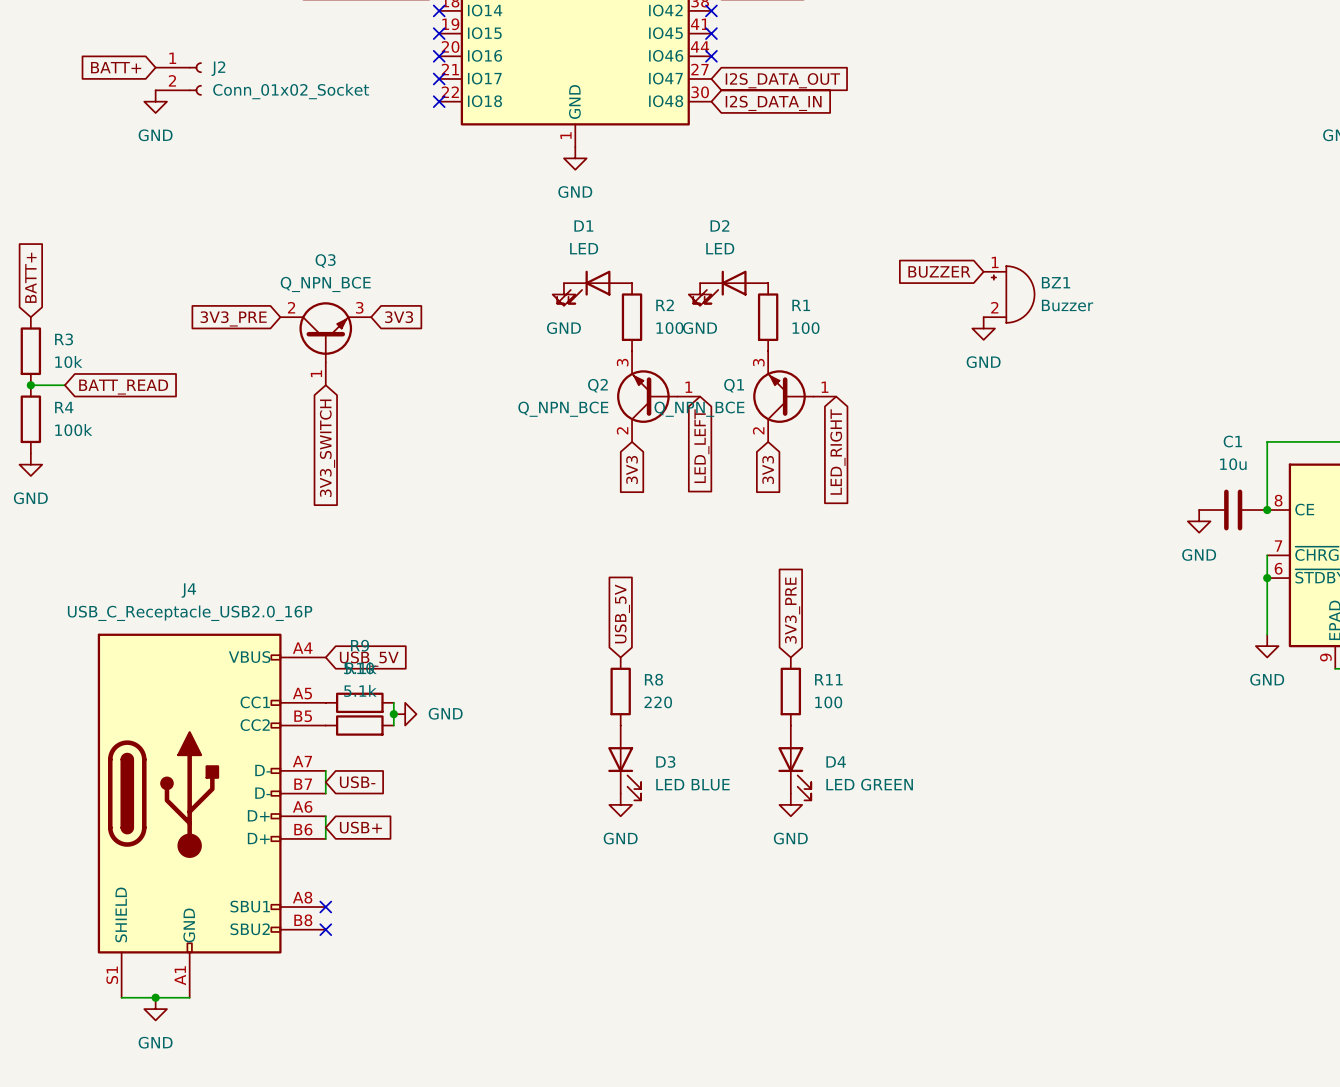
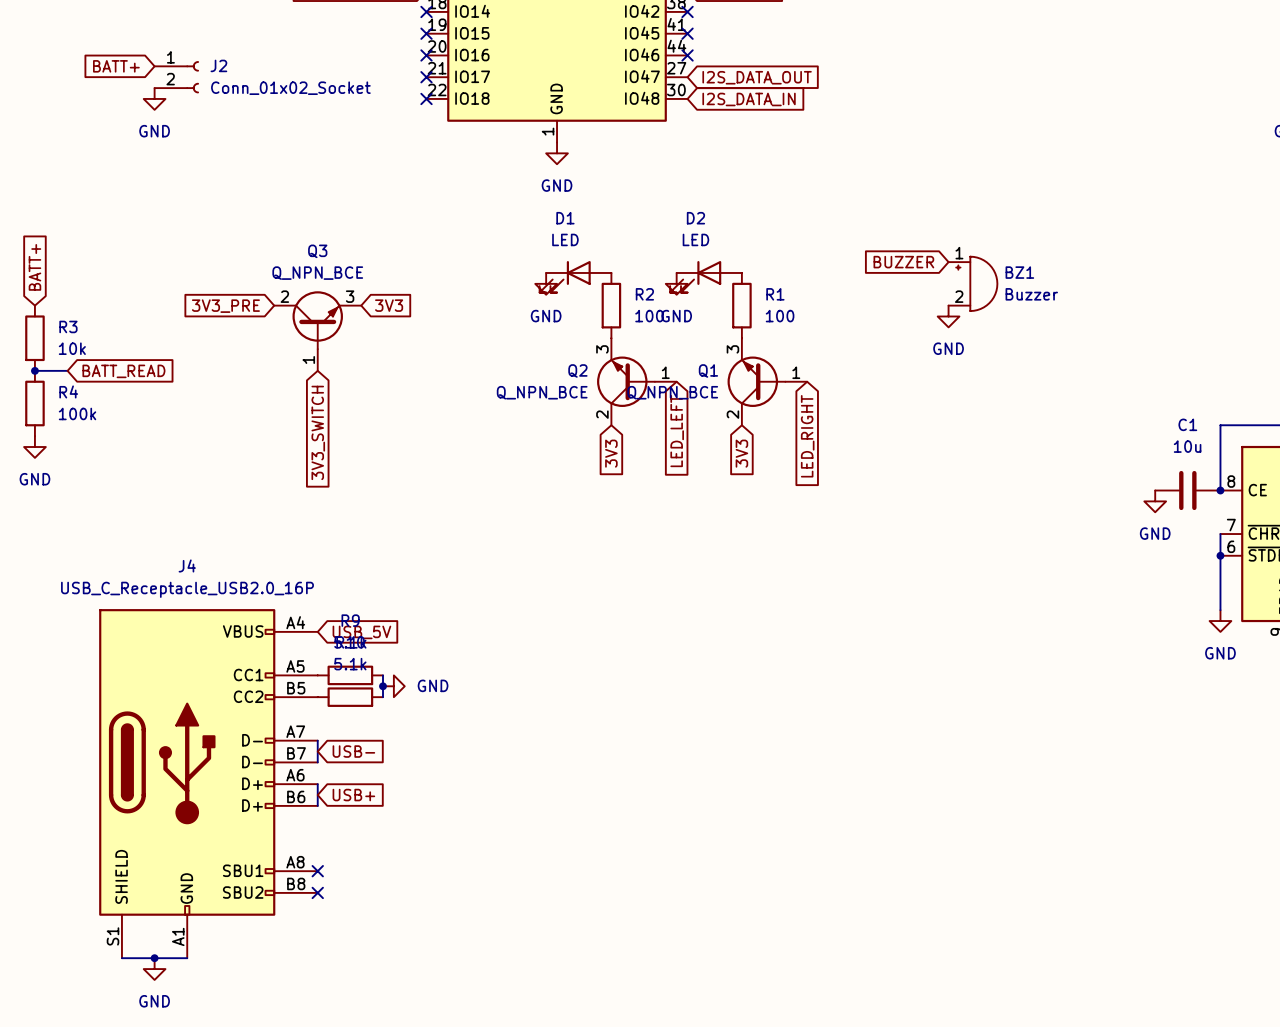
global label: 3V3_PRE (792, 610) -> none
global label: USB_5V (622, 613) -> none
R8: 220 (620, 691) -> none
R11: 100 (790, 691) -> none
D3: LED BLUE (624, 762) -> none
D4: LED GREEN (794, 762) -> none
power symbol: GND (620, 804) -> none
power symbol: GND (790, 804) -> none

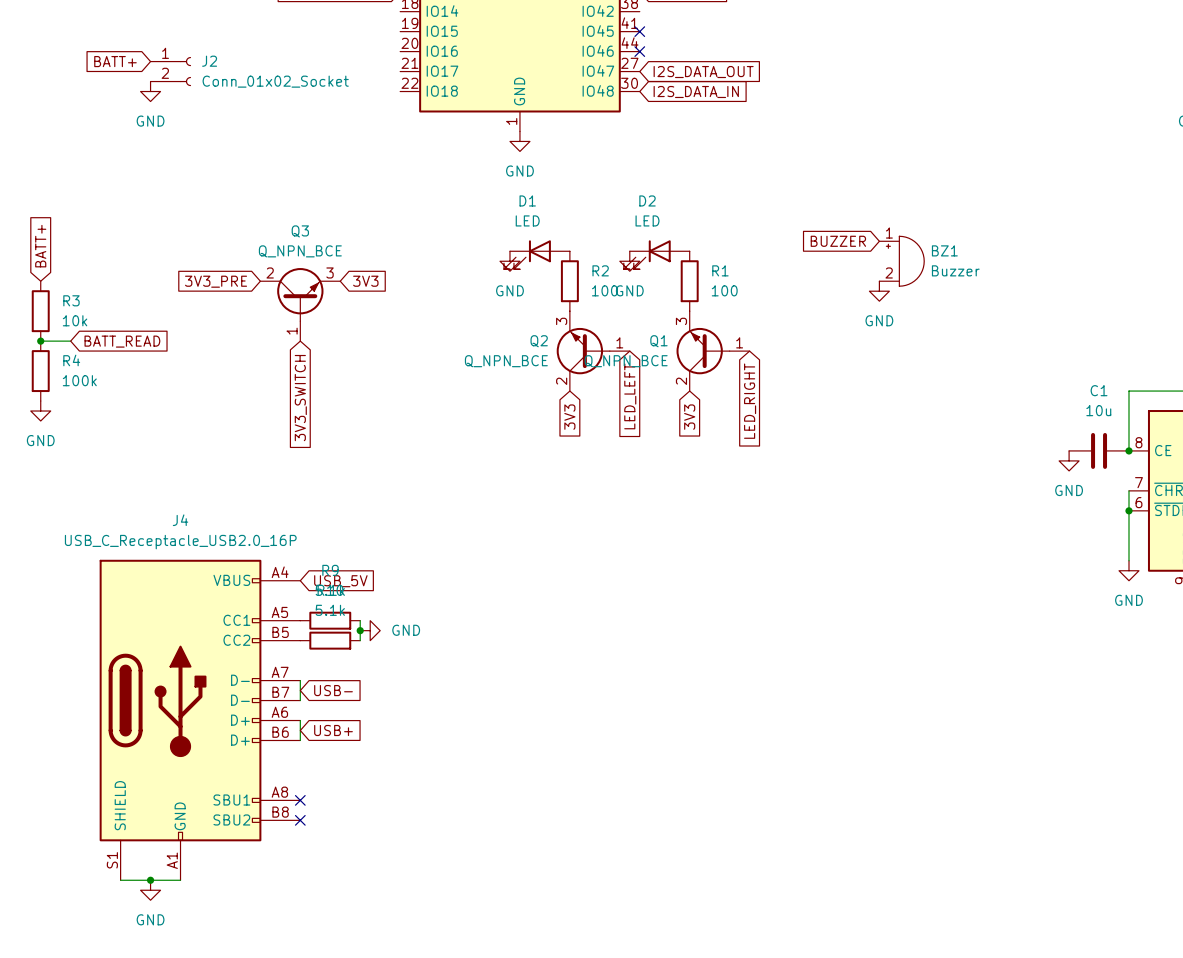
no-connect mark: (426, 11) -> none
no-connect mark: (687, 11) -> none
no-connect mark: (426, 33) -> none
no-connect mark: (426, 55) -> none
no-connect mark: (426, 77) -> none
no-connect mark: (426, 98) -> none

